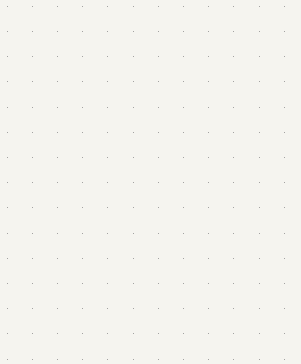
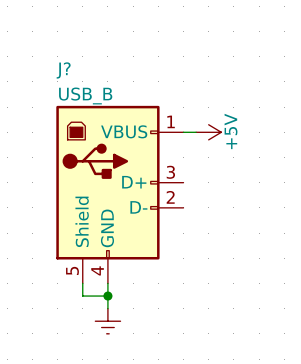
wire: none -> (183, 132) (196, 132)
power symbol: none -> +5V (208, 132)
J?: none -> USB_B (119, 194)
wire: none -> (82, 283) (82, 296) (107, 296)
wire: none -> (107, 283) (107, 308)
junction: none -> (107, 296)
power symbol: none -> (107, 321)

